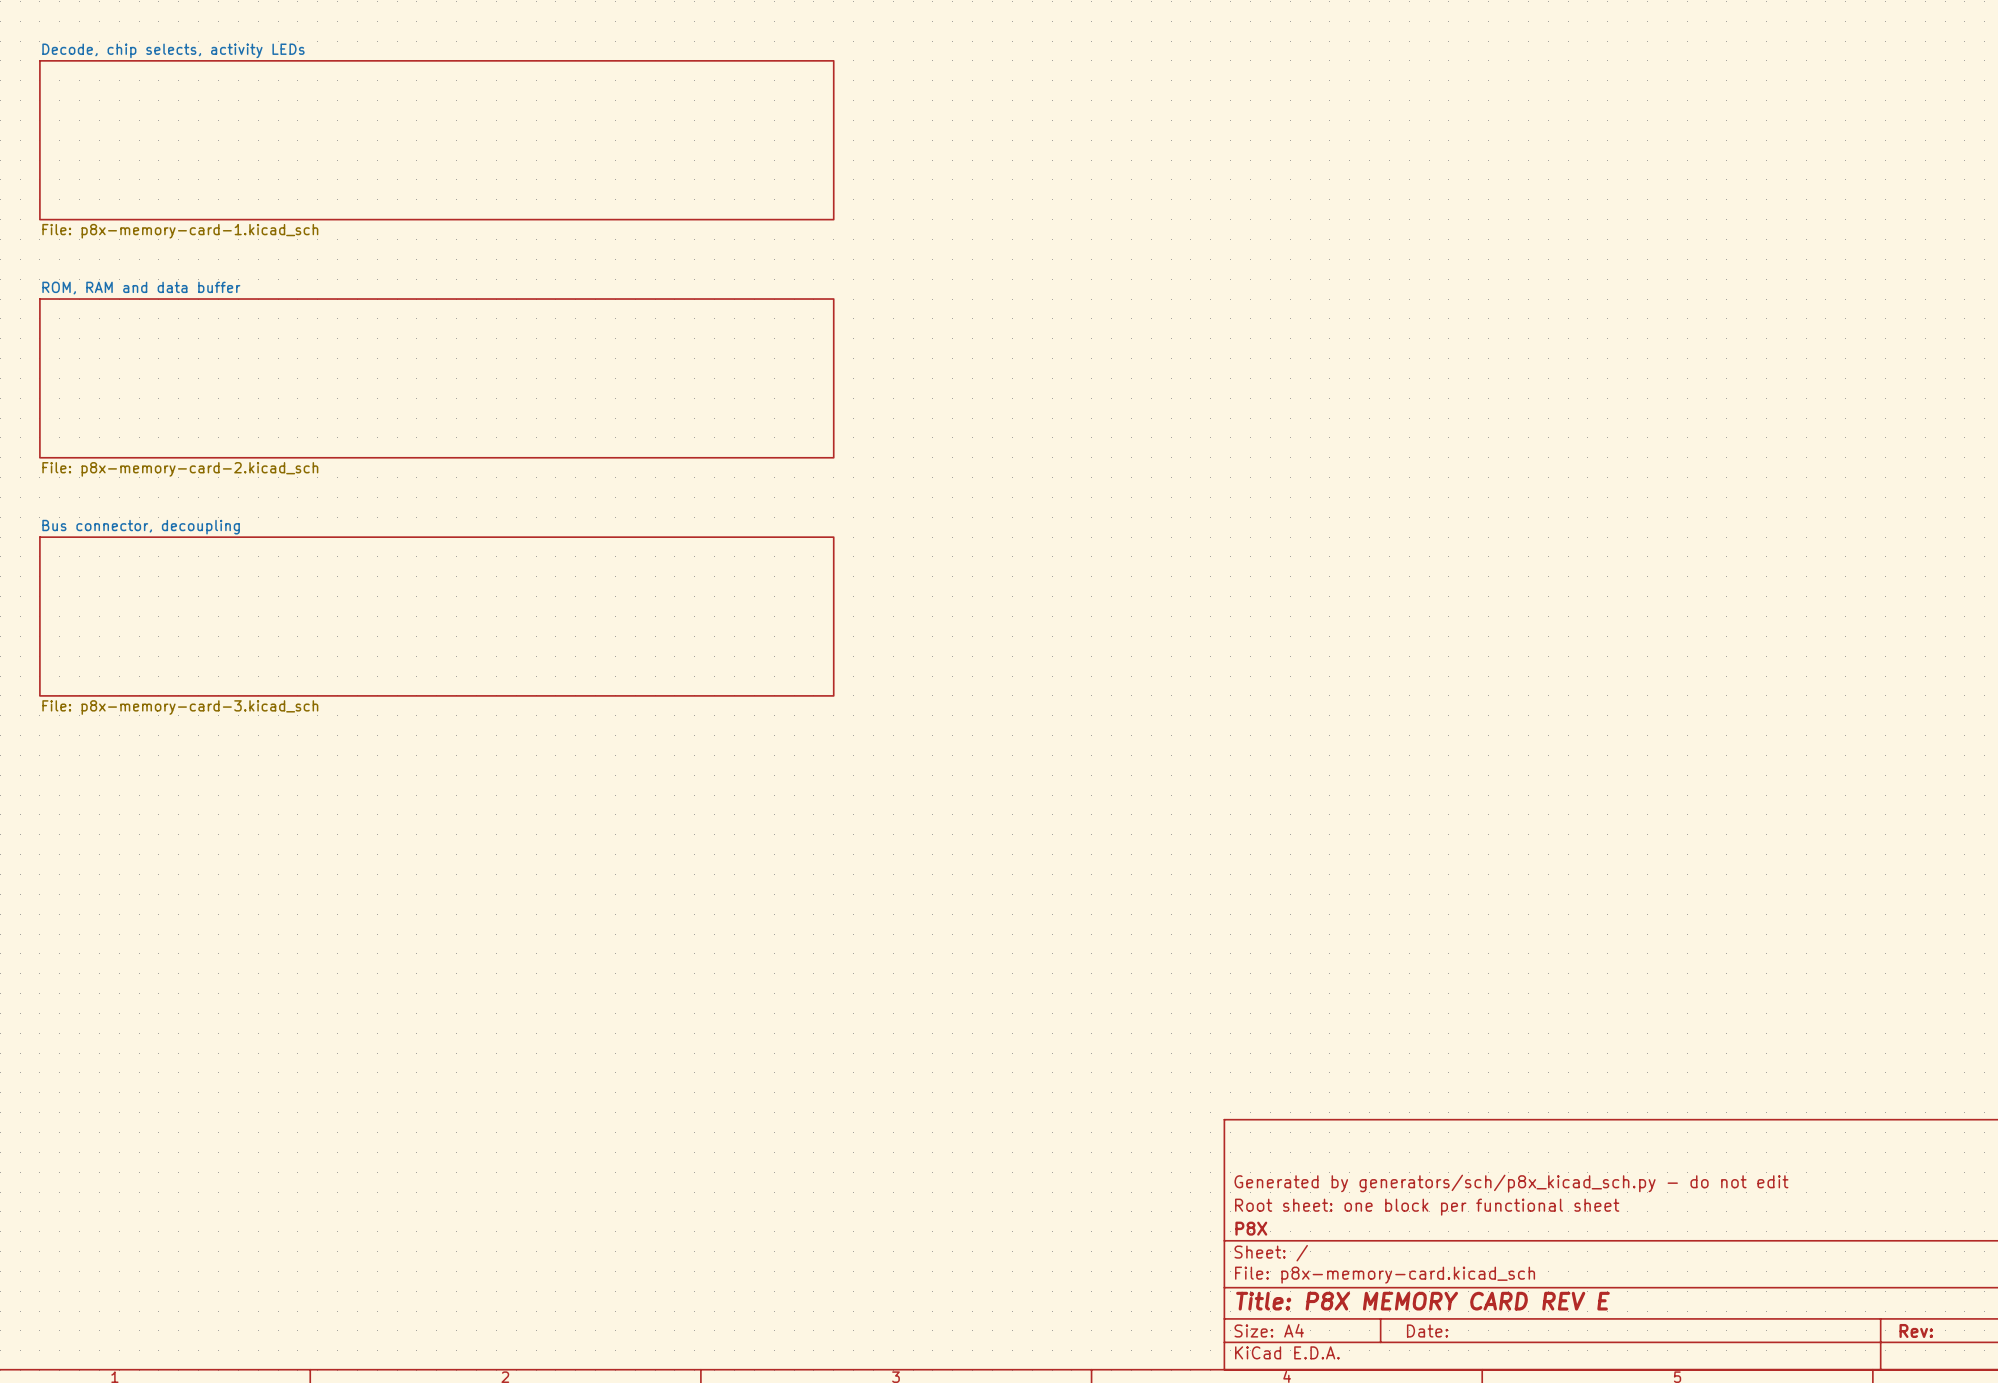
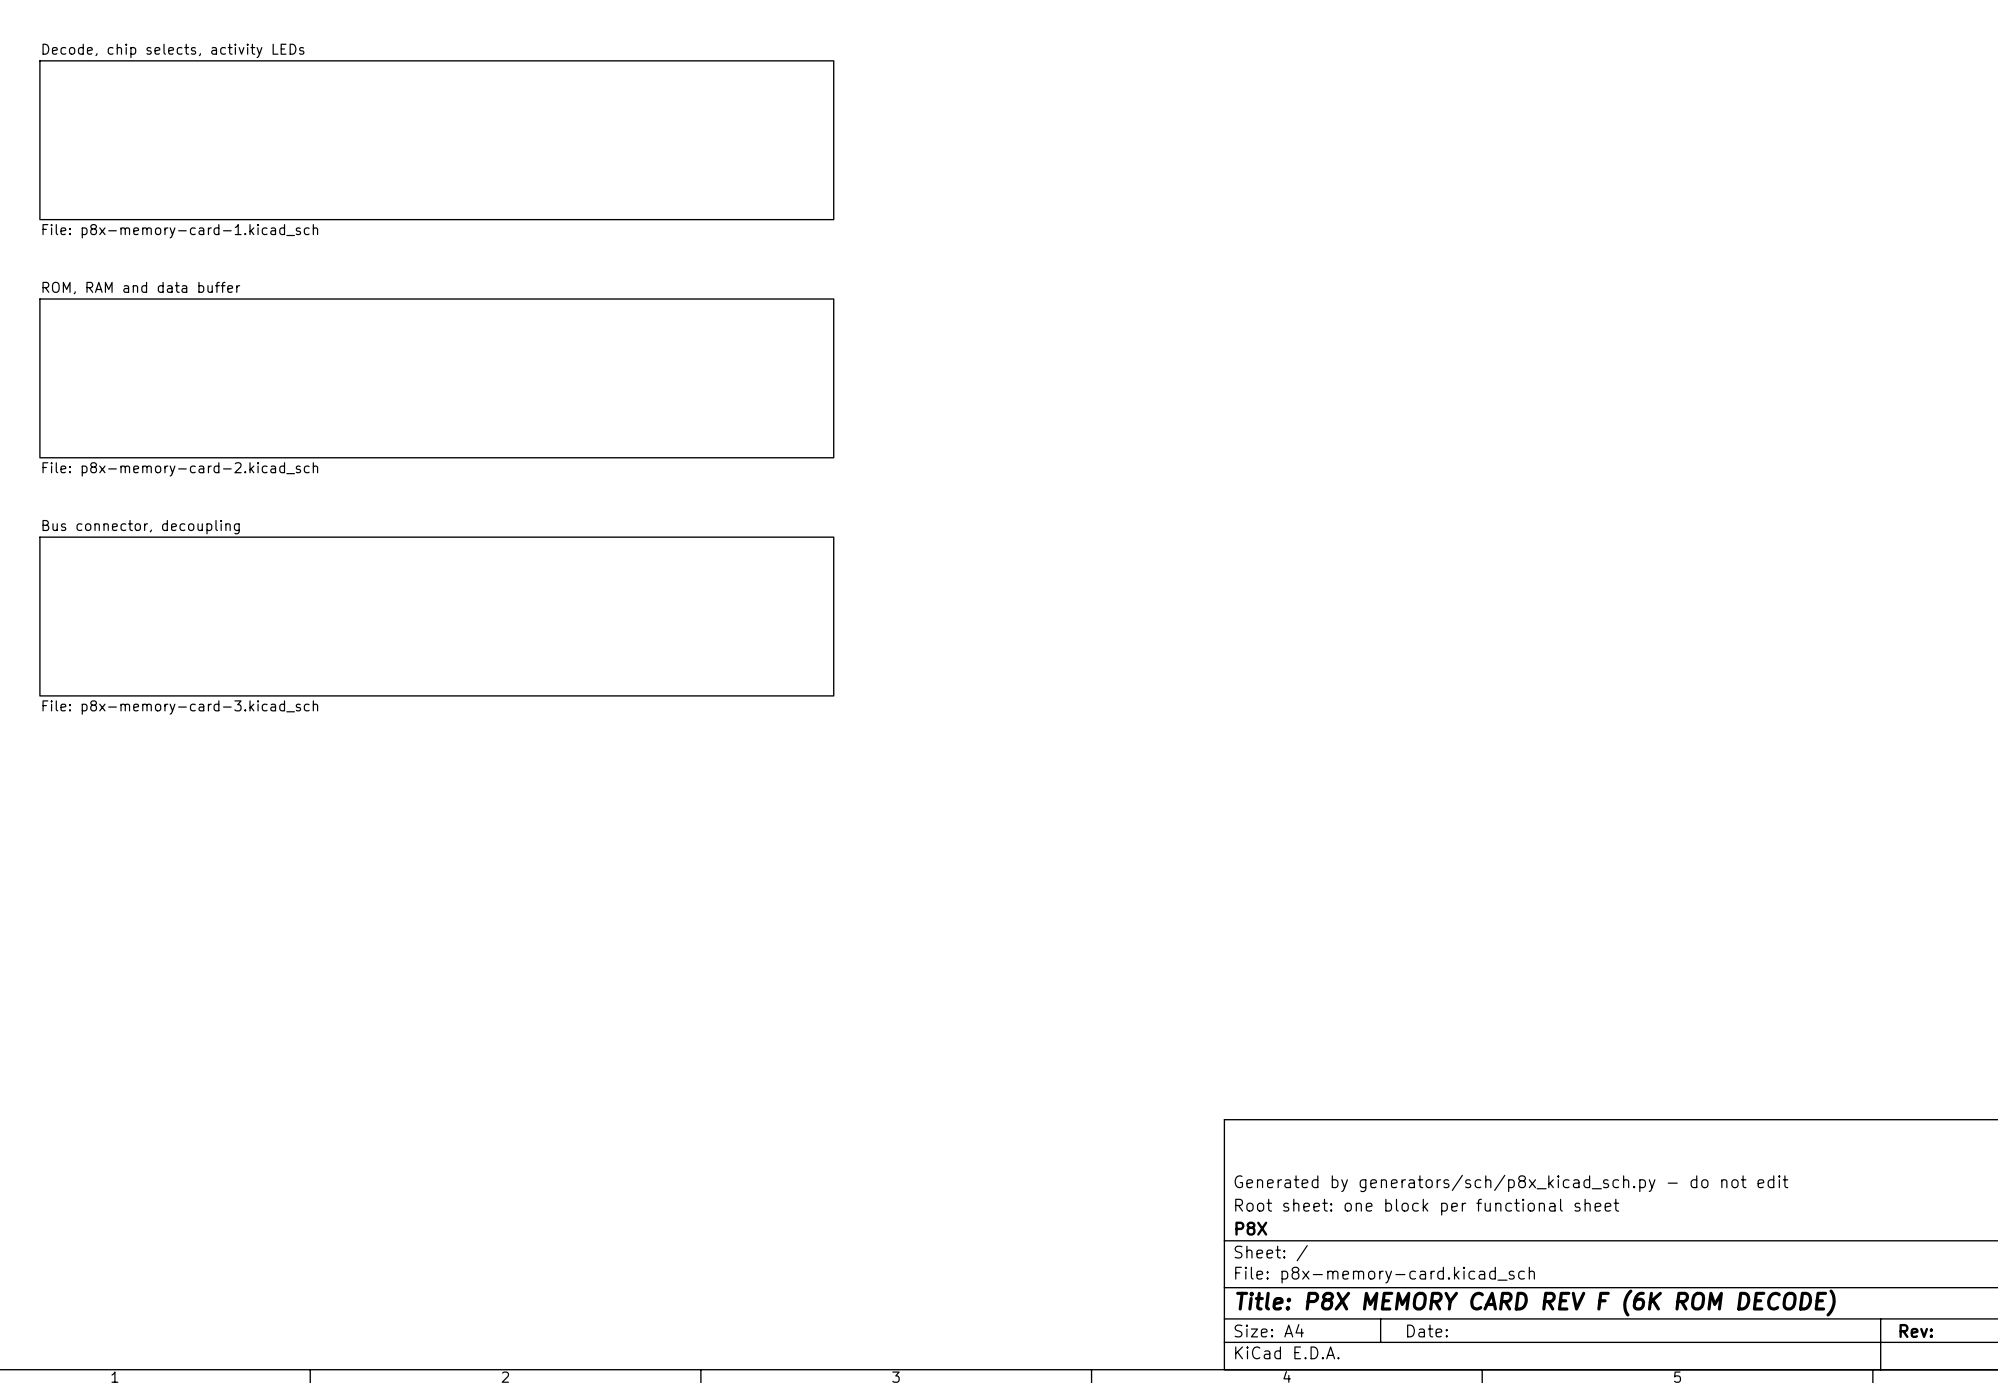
title block: Title: P8X MEMORY CARD REV E (1422, 1301) -> Title: P8X MEMORY CARD REV F (6K ROM DECODE) (1535, 1303)

